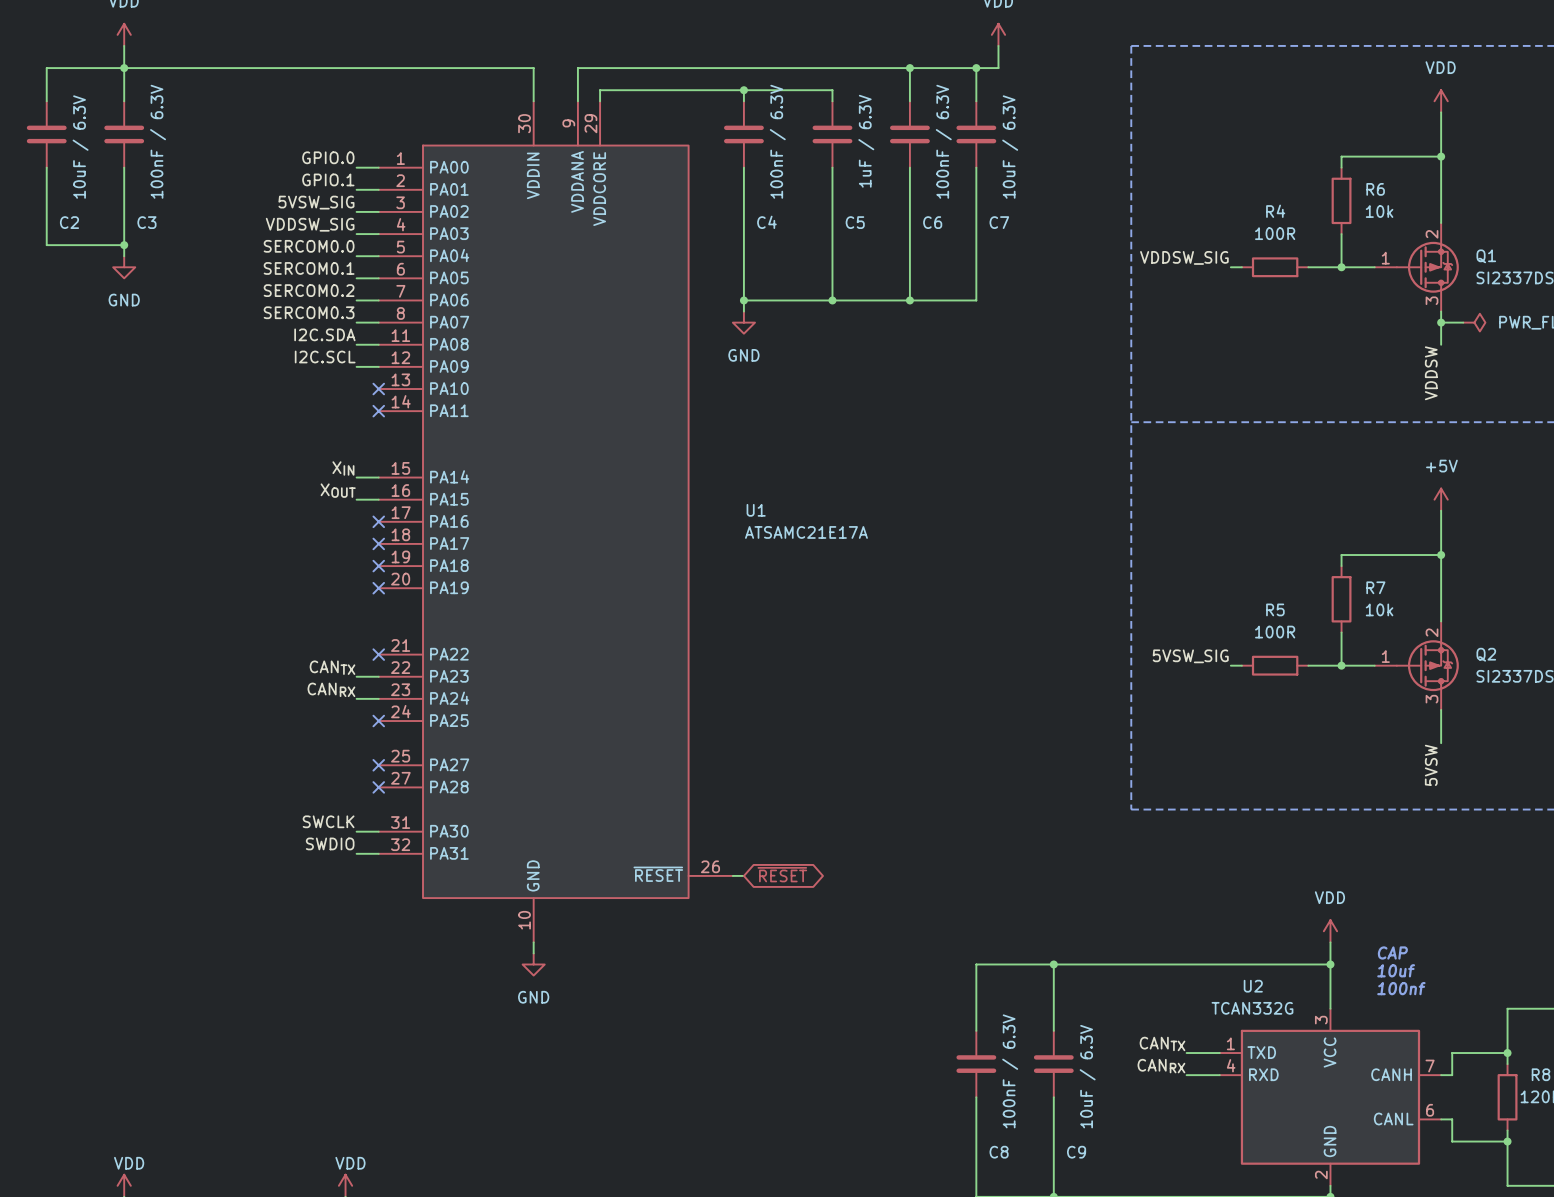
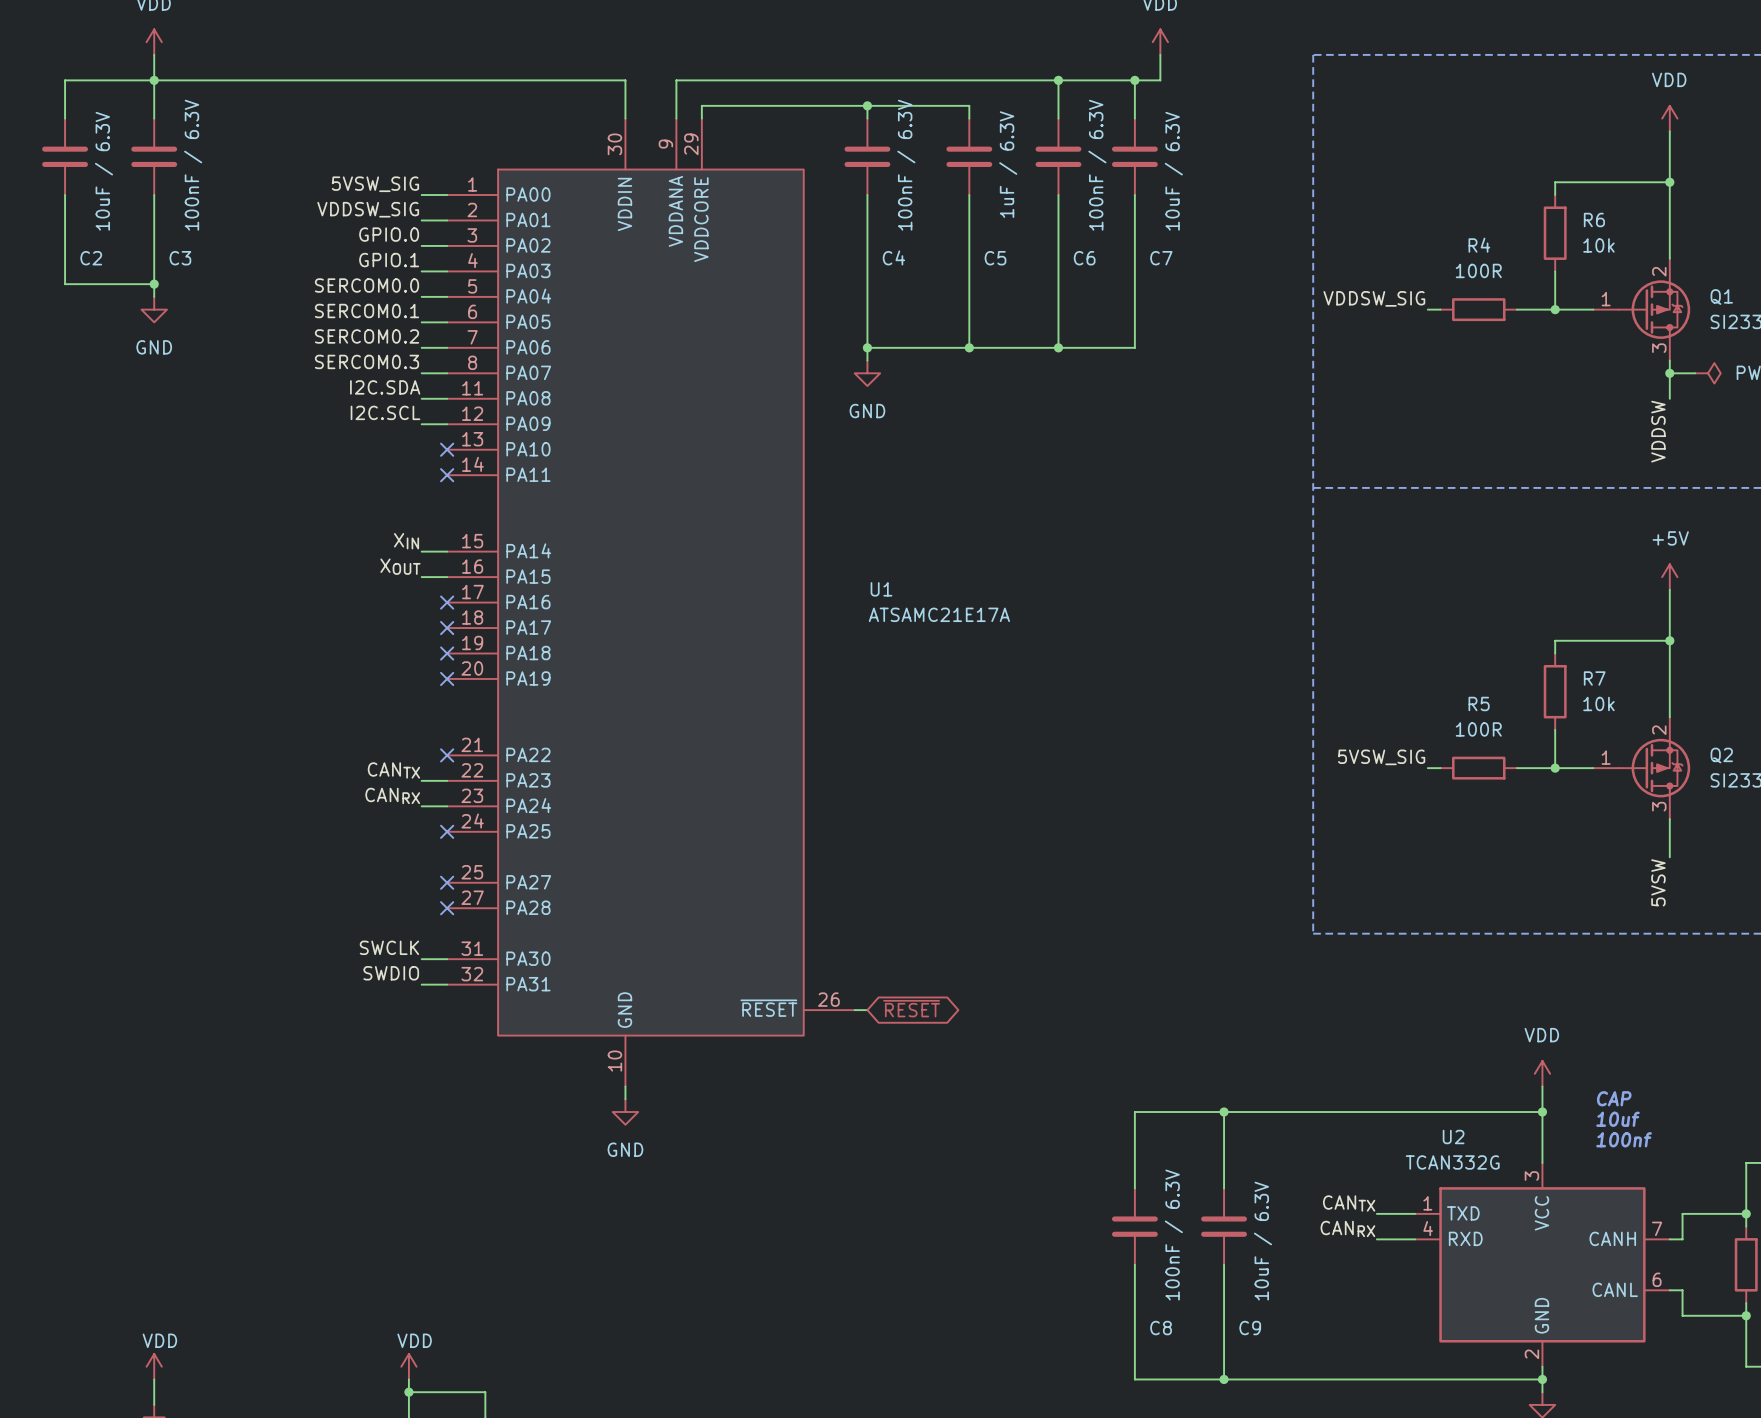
label: GPIO.0 (328, 157) -> 5VSW_SIG (375, 184)
label: GPIO.1 (328, 179) -> VDDSW_SIG (368, 209)
label: 5VSW_SIG (316, 202) -> GPIO.0 (389, 234)
label: VDDSW_SIG (310, 224) -> GPIO.1 (389, 260)

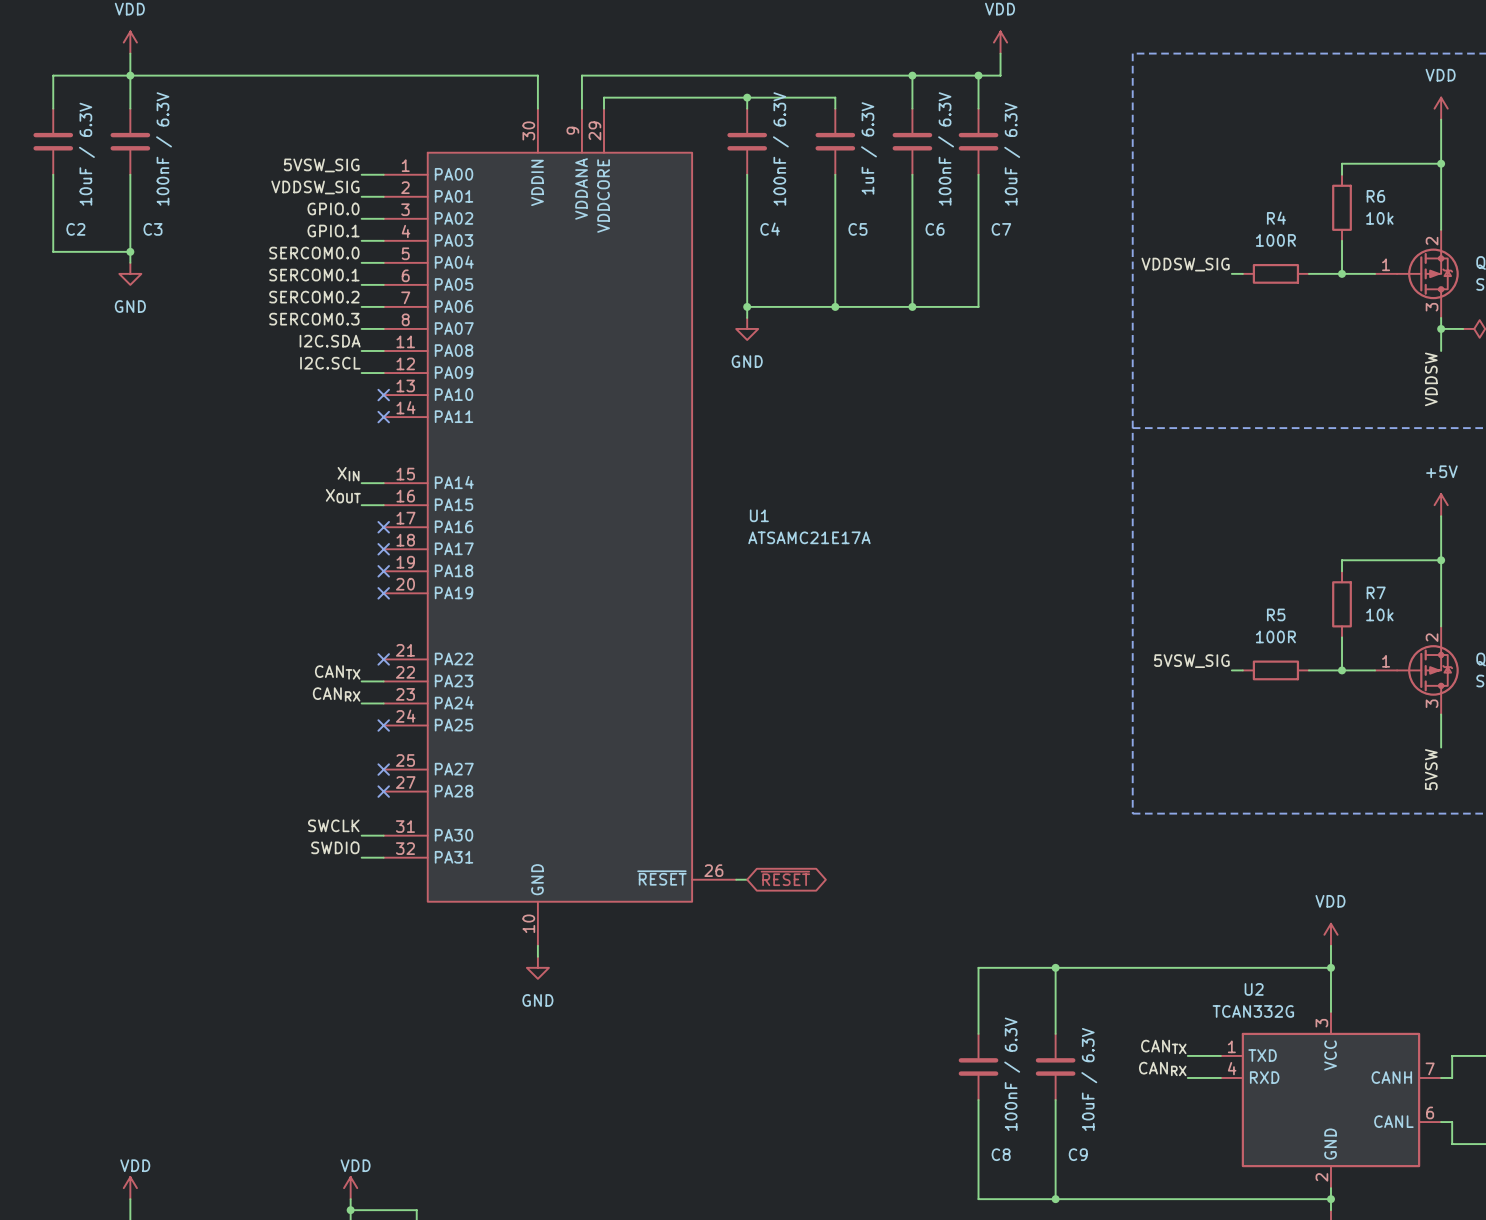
text: CAP (1614, 1098) -> none
text: 10uf (1618, 1119) -> none
text: 100nf (1624, 1139) -> none

